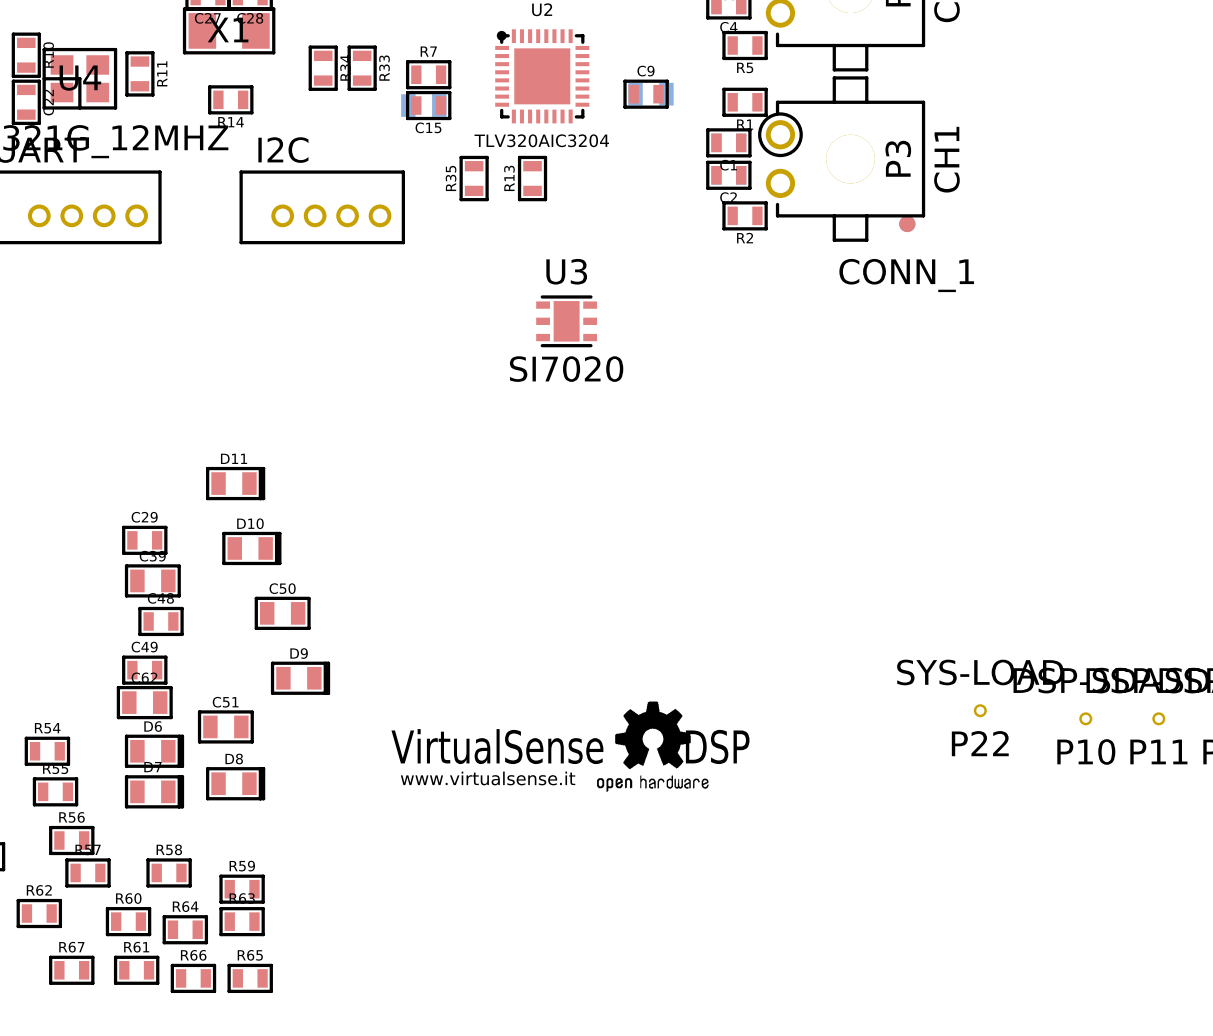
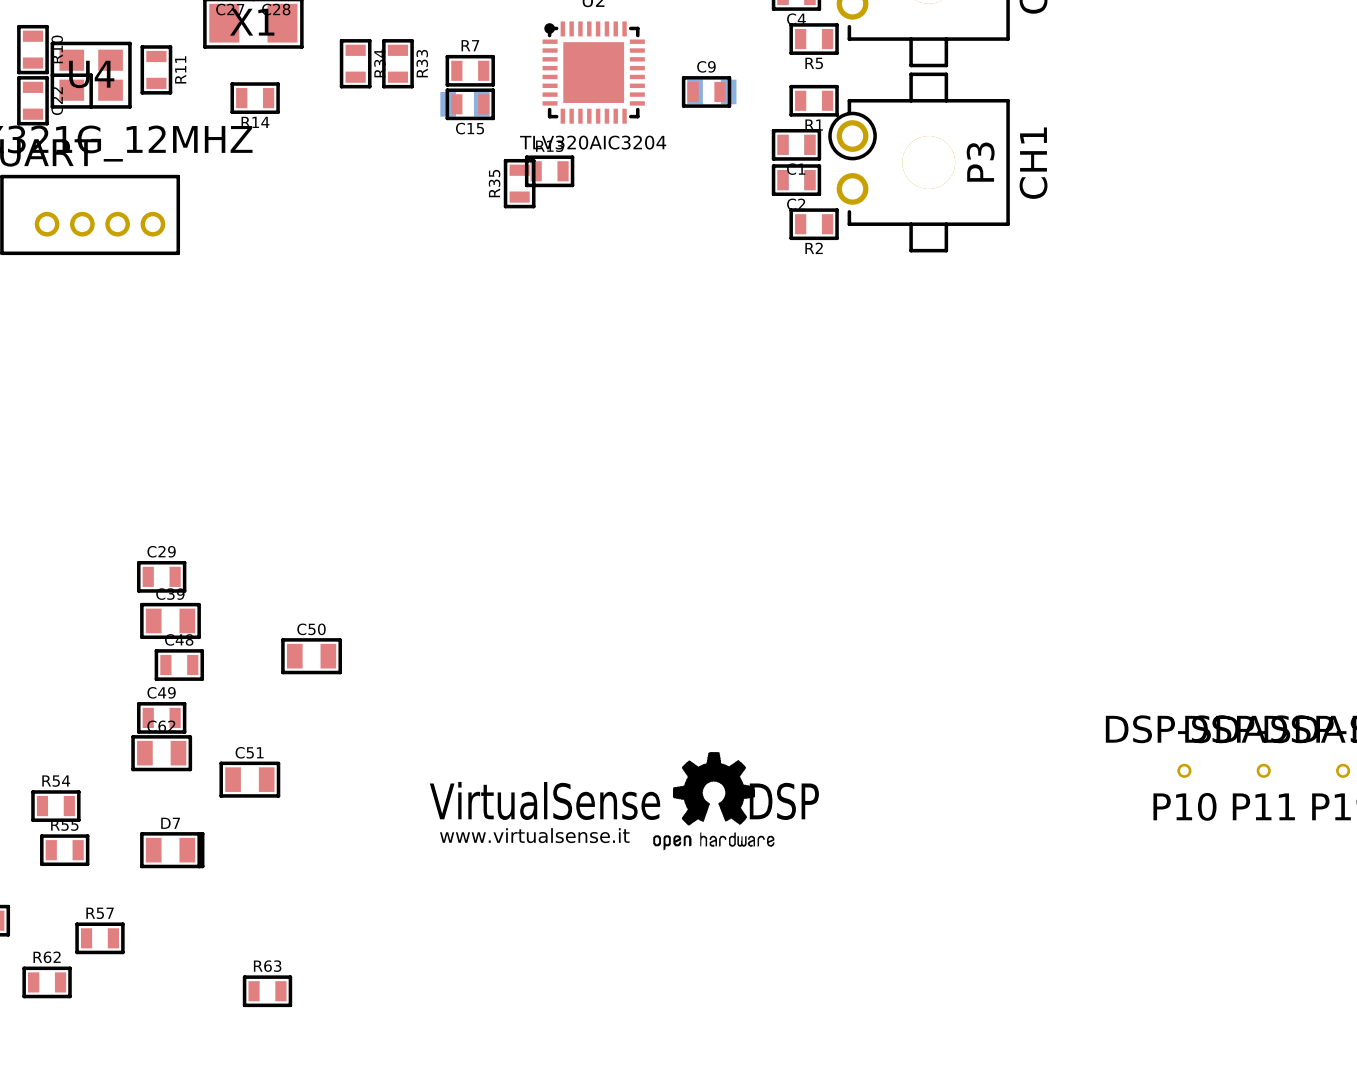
R13 rotation: 0° (532, 178) -> 90° clockwise (549, 171)
R13 position: (532, 178) -> (549, 171)
part: I2C (322, 207) -> none
part: CONN_1 (907, 223) -> none
U3: SI7020 (566, 321) -> none
D11: (235, 483) -> none
D10: (251, 548) -> none
D9: (300, 678) -> none
P22: SYS-LOAD (980, 710) -> none
D6: (154, 751) -> none
D8: (235, 783) -> none
R56: (71, 840) -> none
R58: (169, 872) -> none
R59: (242, 889) -> none
R60: (128, 921) -> none
R64: (185, 929) -> none
R67: (71, 970) -> none
R61: (136, 970) -> none
R66: (193, 978) -> none
R65: (250, 978) -> none

